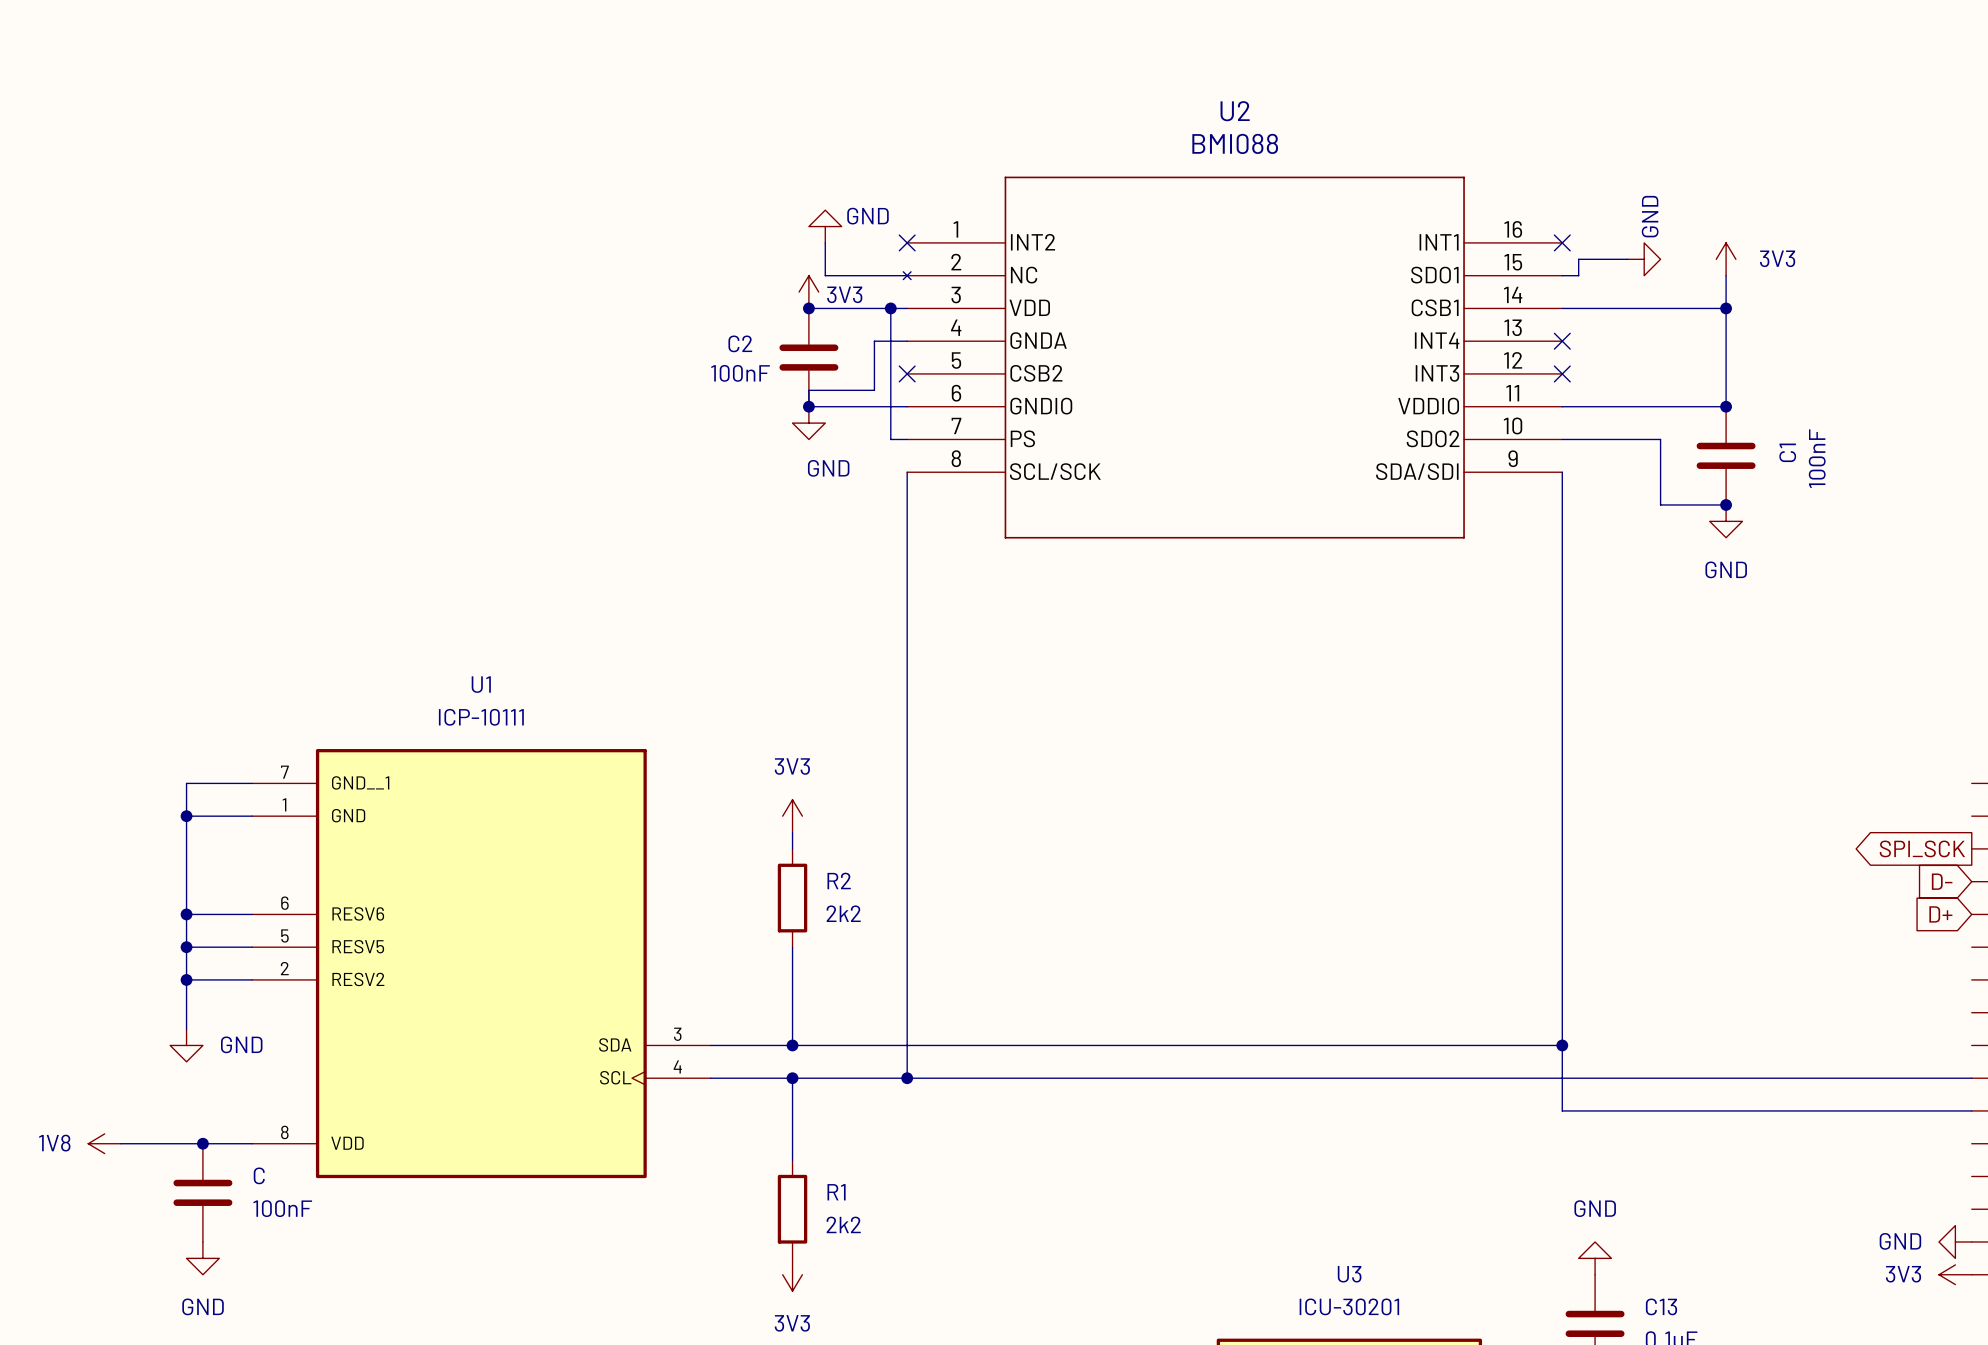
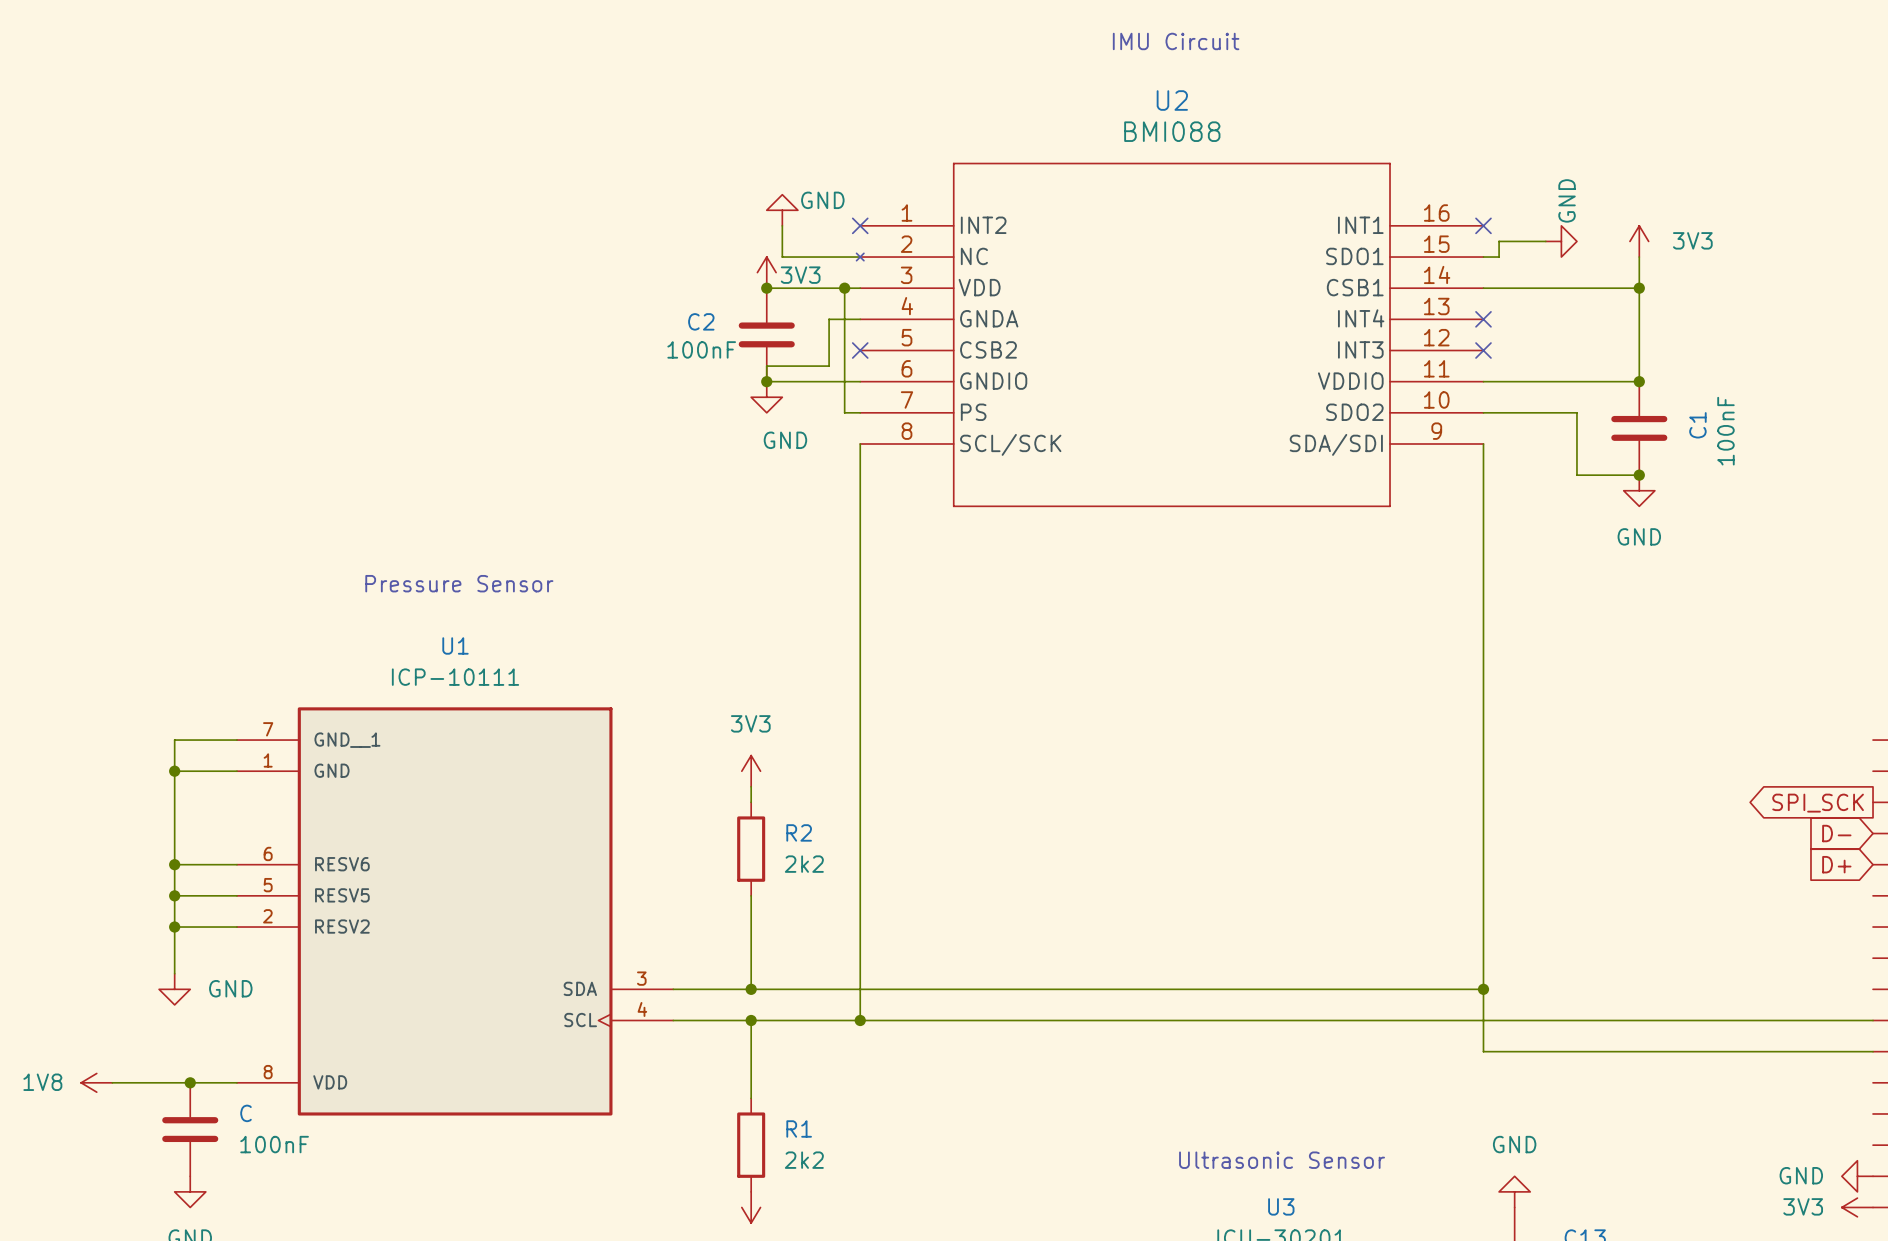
text: none -> IMU Circuit (1176, 41)
text: none -> Pressure Sensor (459, 583)
text: none -> Ultrasonic Sensor (1282, 1160)

